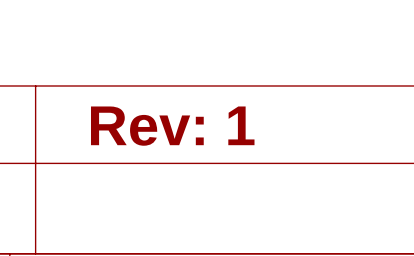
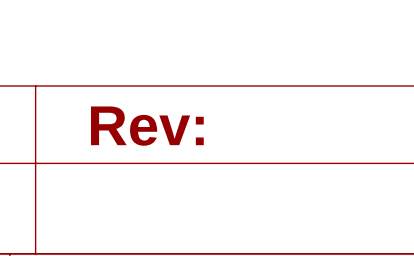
title block: Rev: 1 (172, 126) -> Rev: (147, 126)

